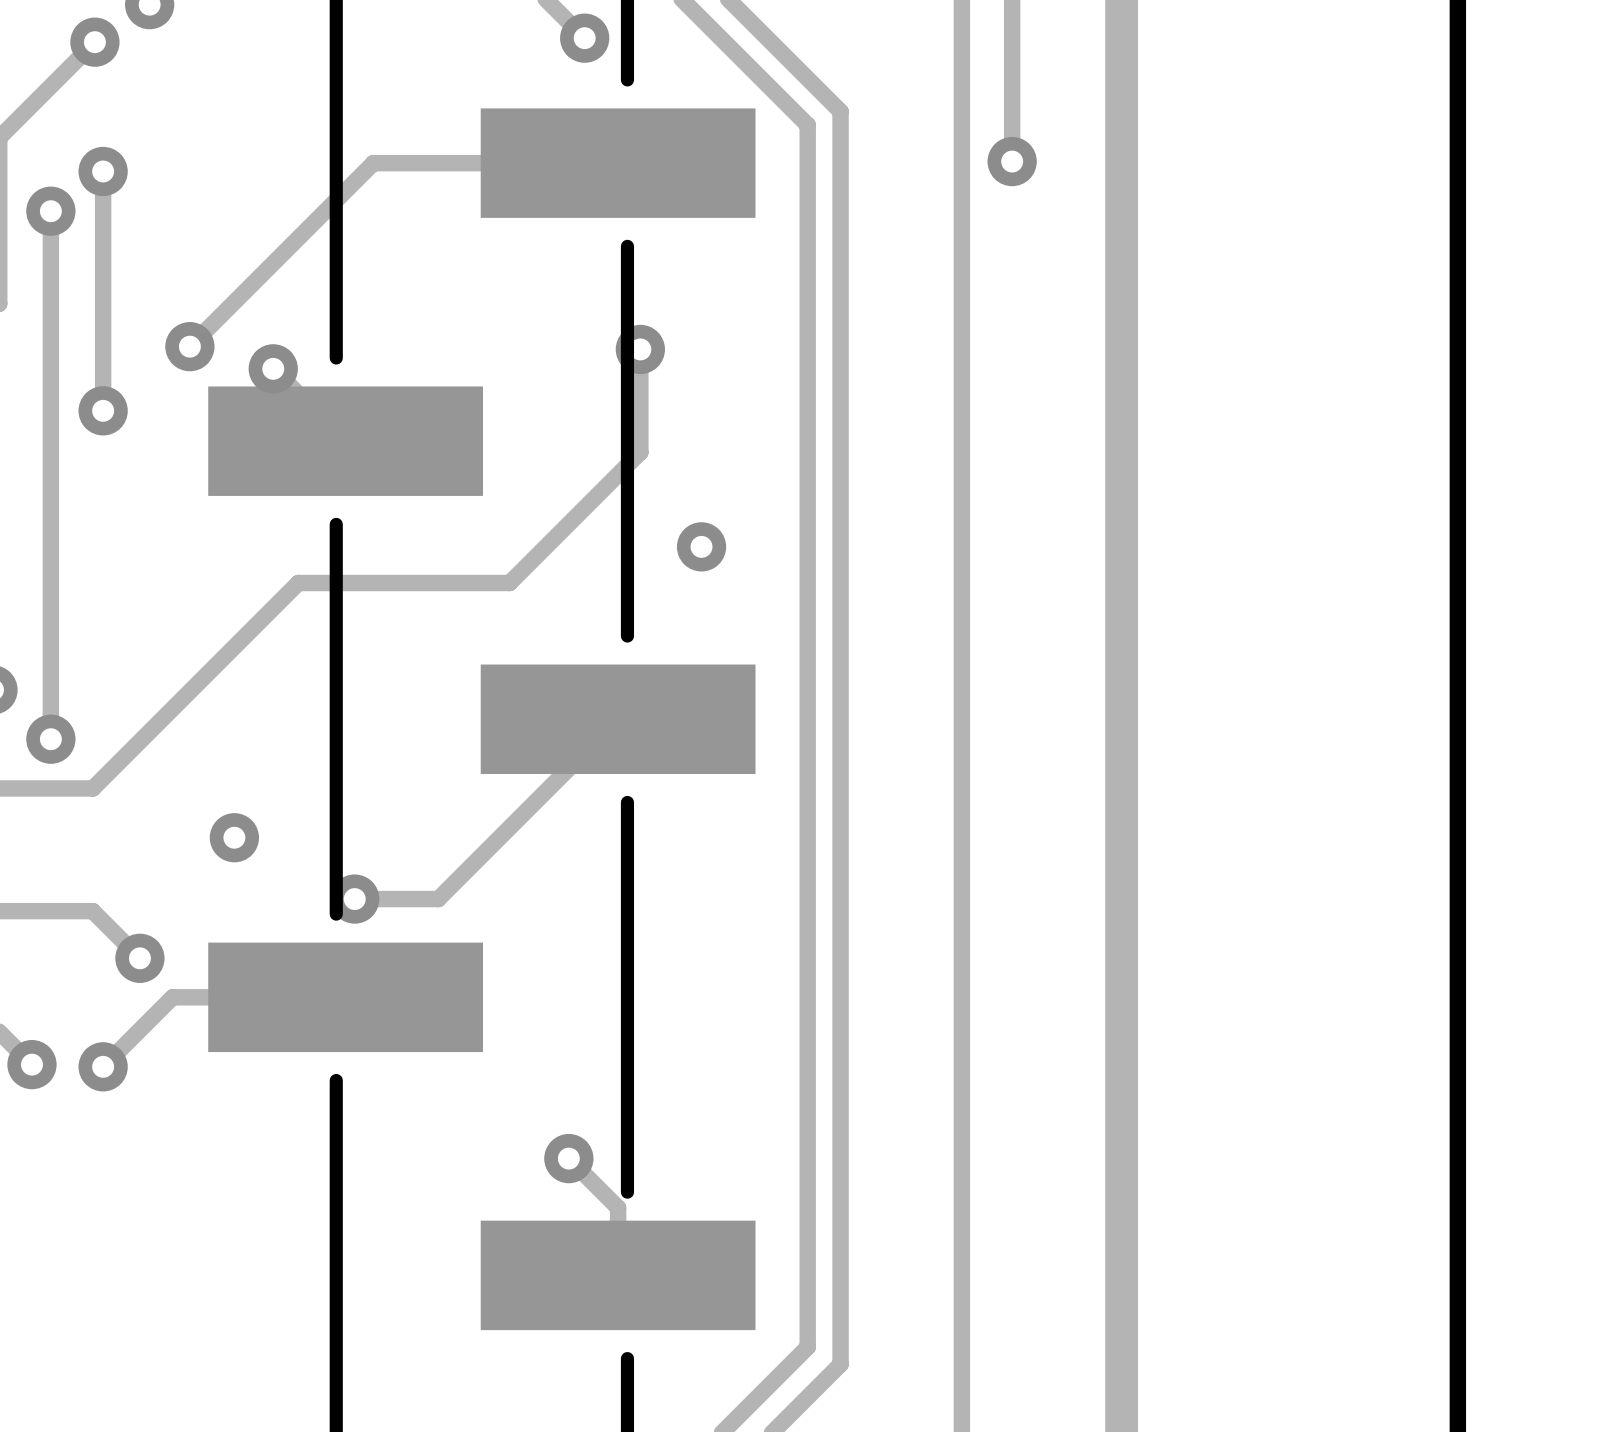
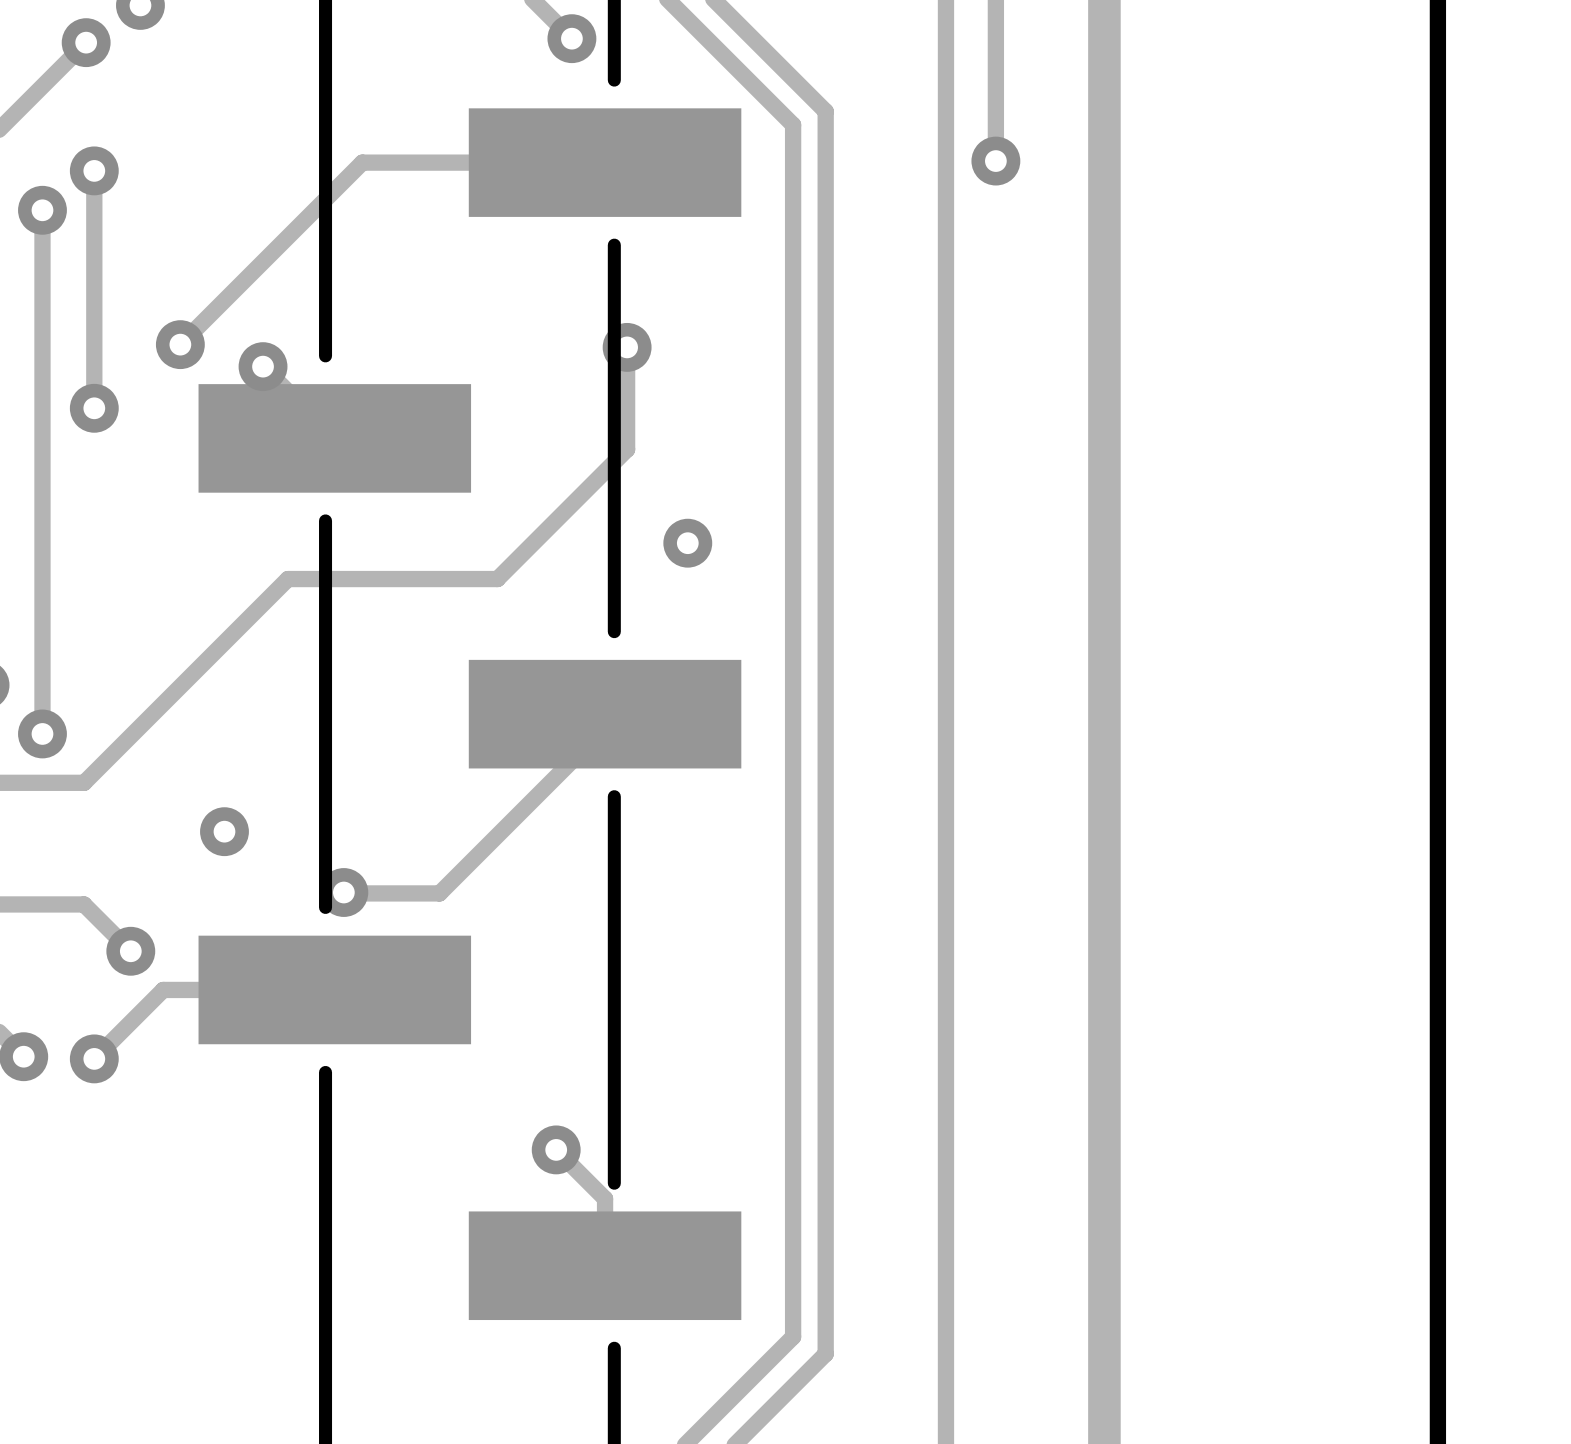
track: (618, 719) (438, 899) (354, 899) -> (618, 714) (439, 893) (343, 893)

